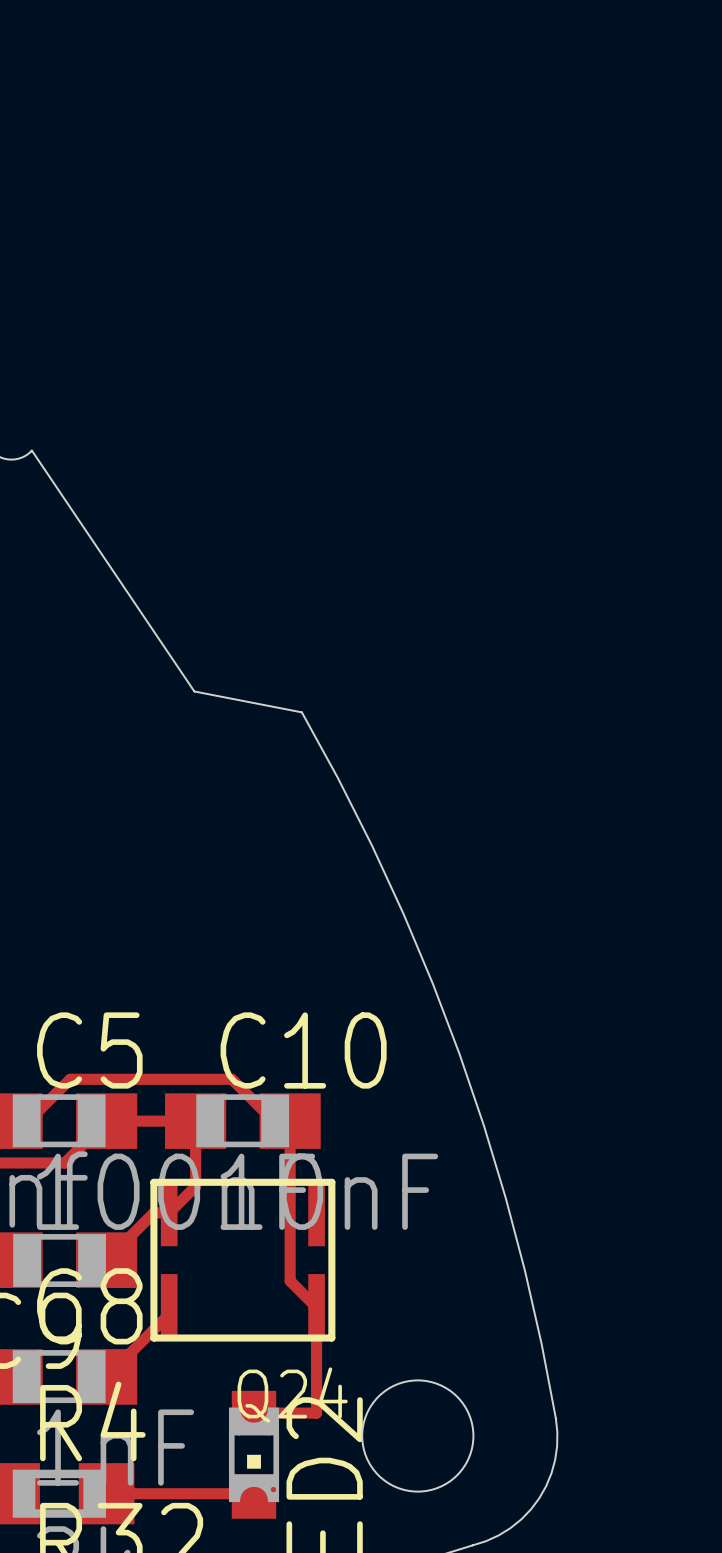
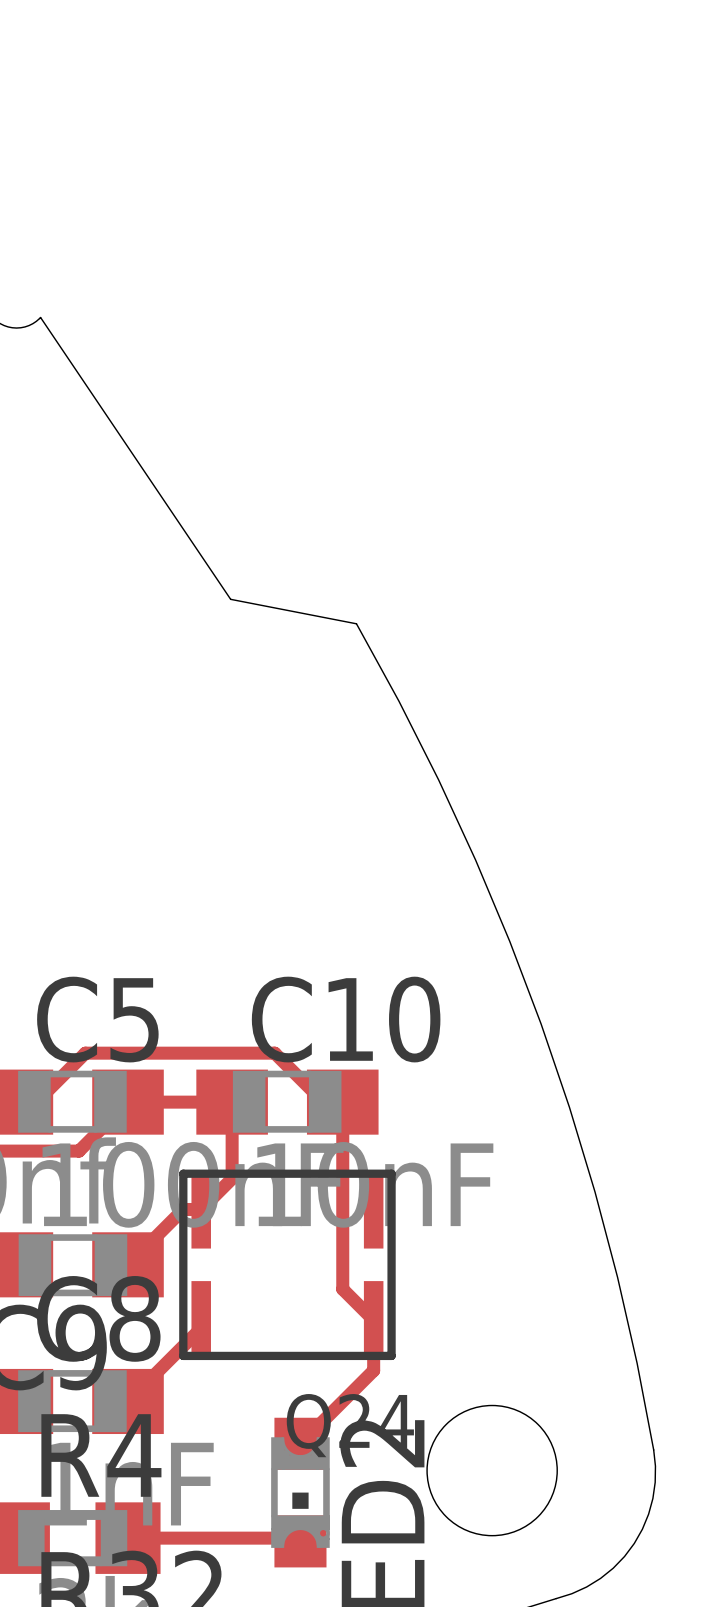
top track: (316, 1350) (316, 1413) (254, 1413) -> (373, 1370) (300, 1443)

